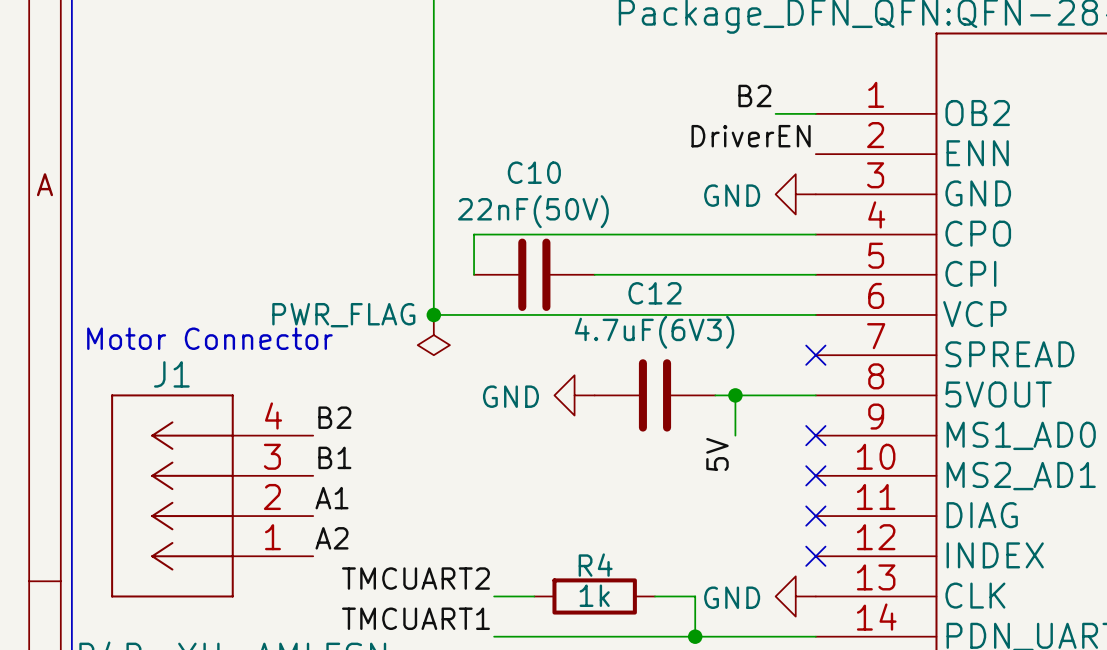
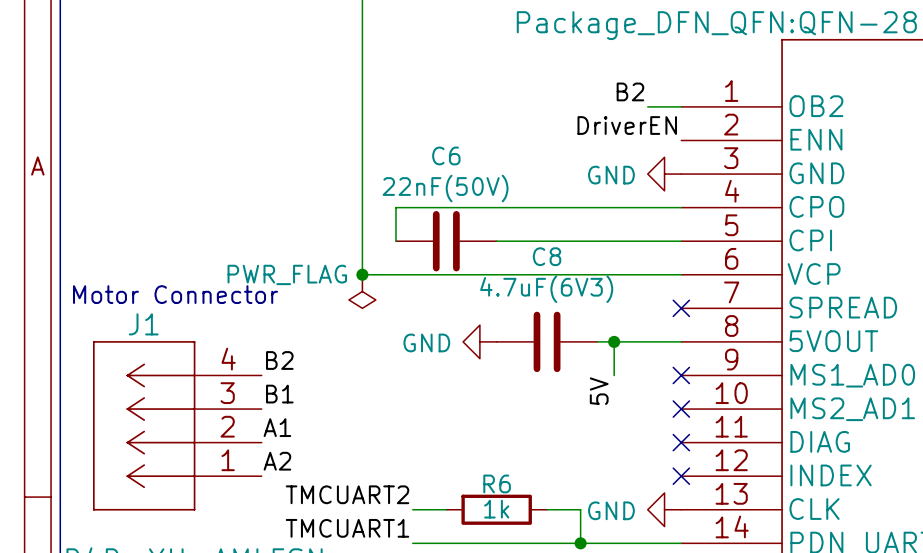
C10 name: C10 (534, 172) -> C6 (446, 155)
C12 name: C12 (654, 293) -> C8 (547, 256)
R4 name: R4 (595, 565) -> R6 (497, 483)

